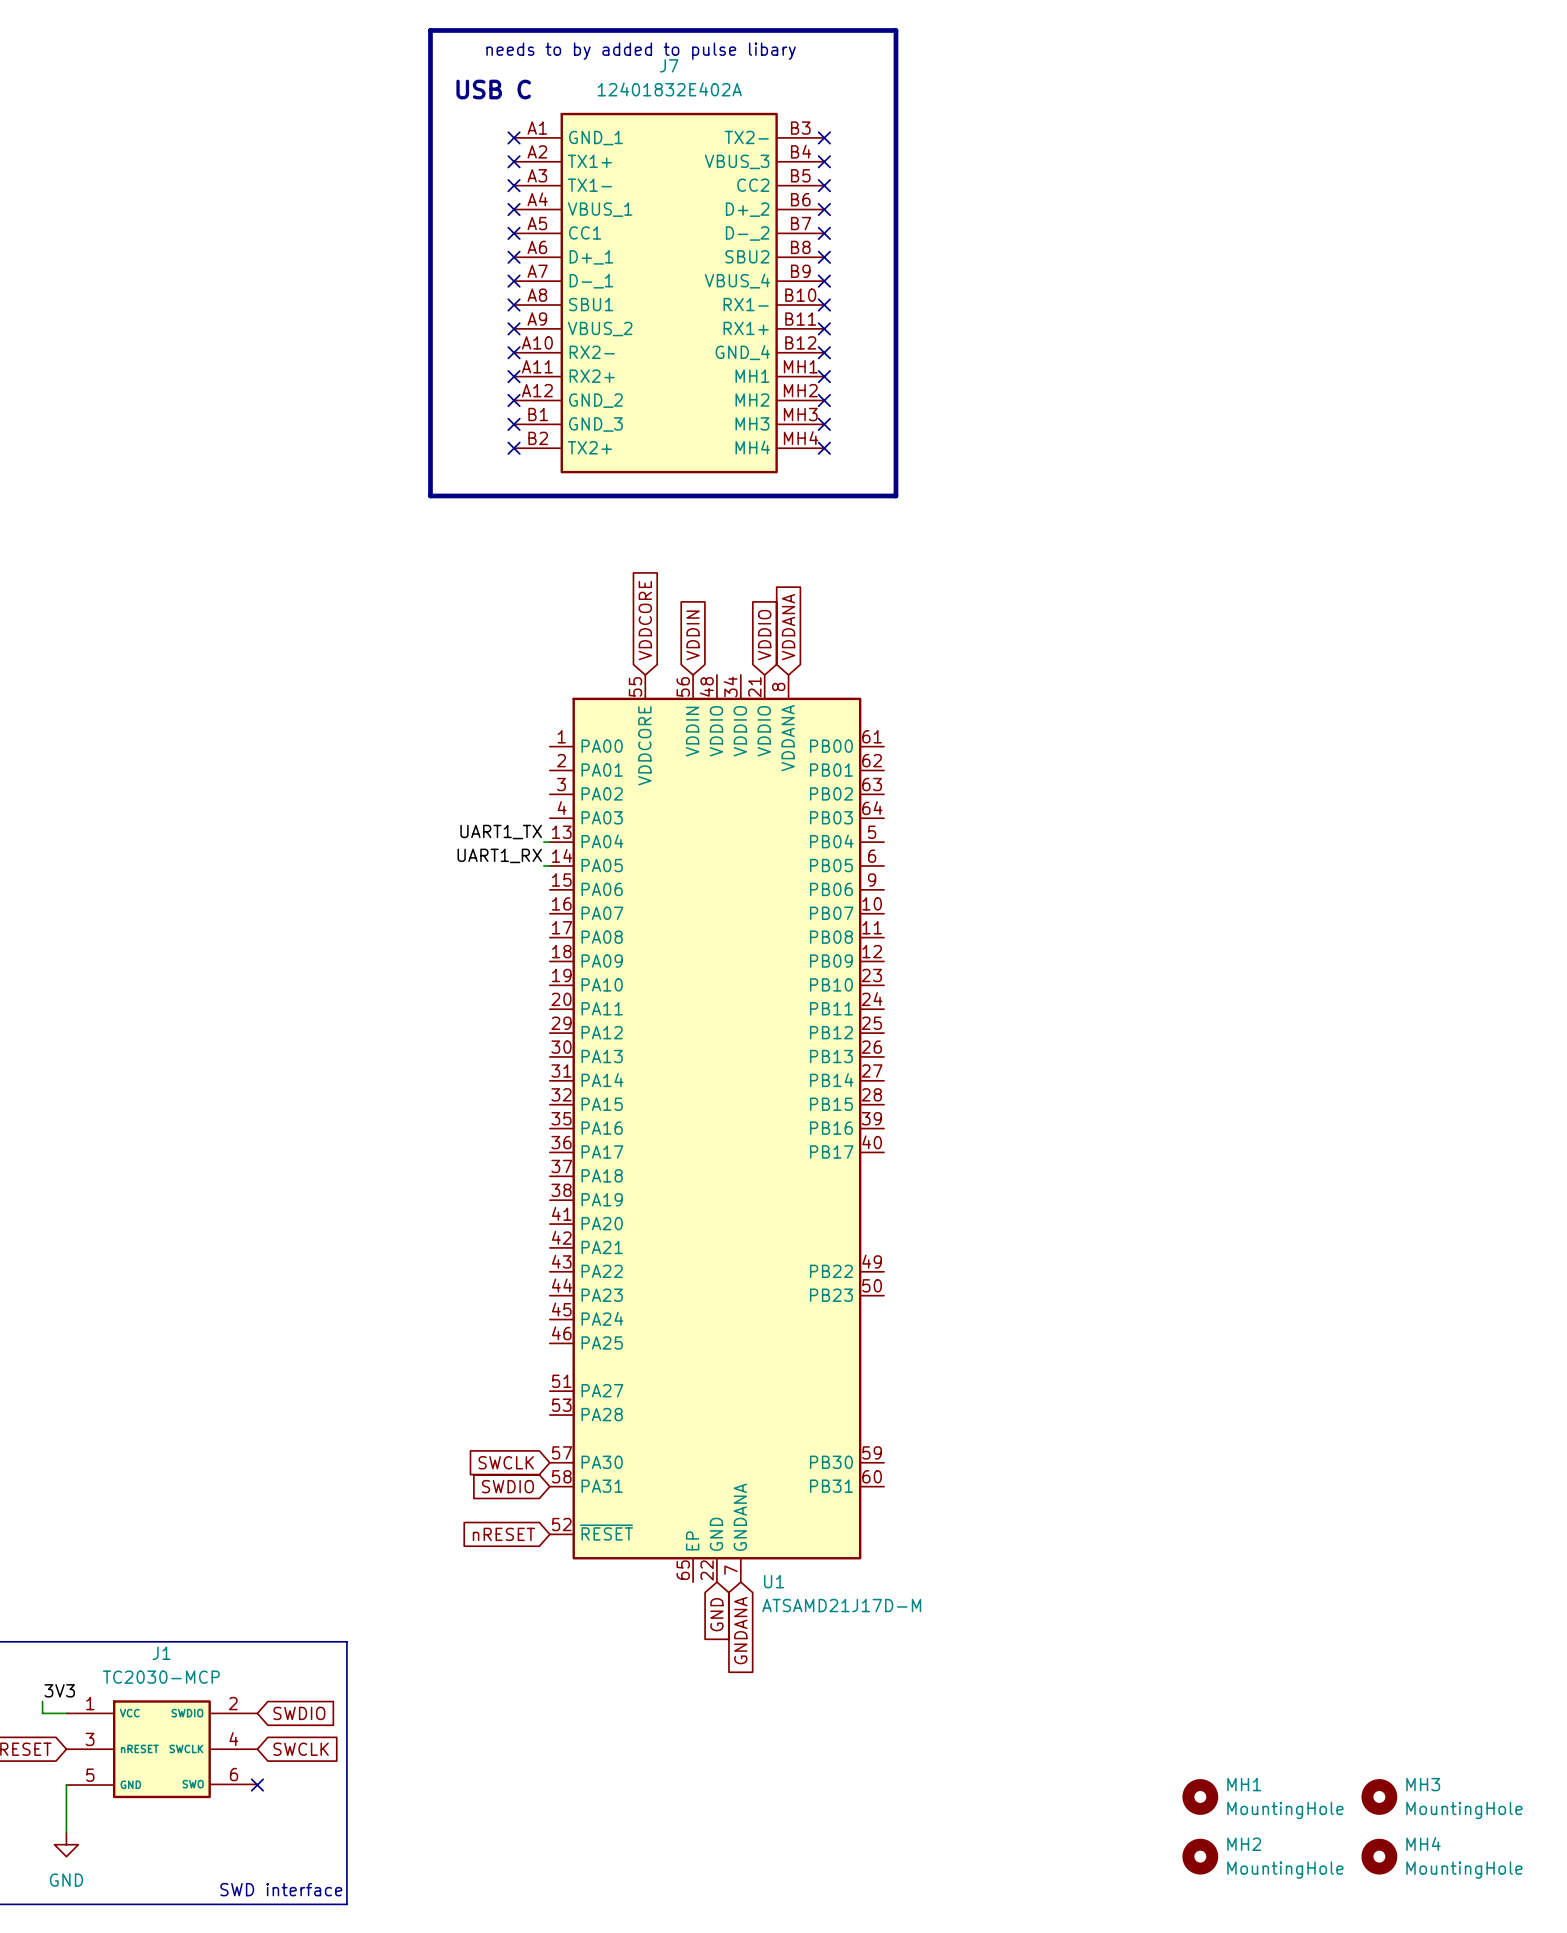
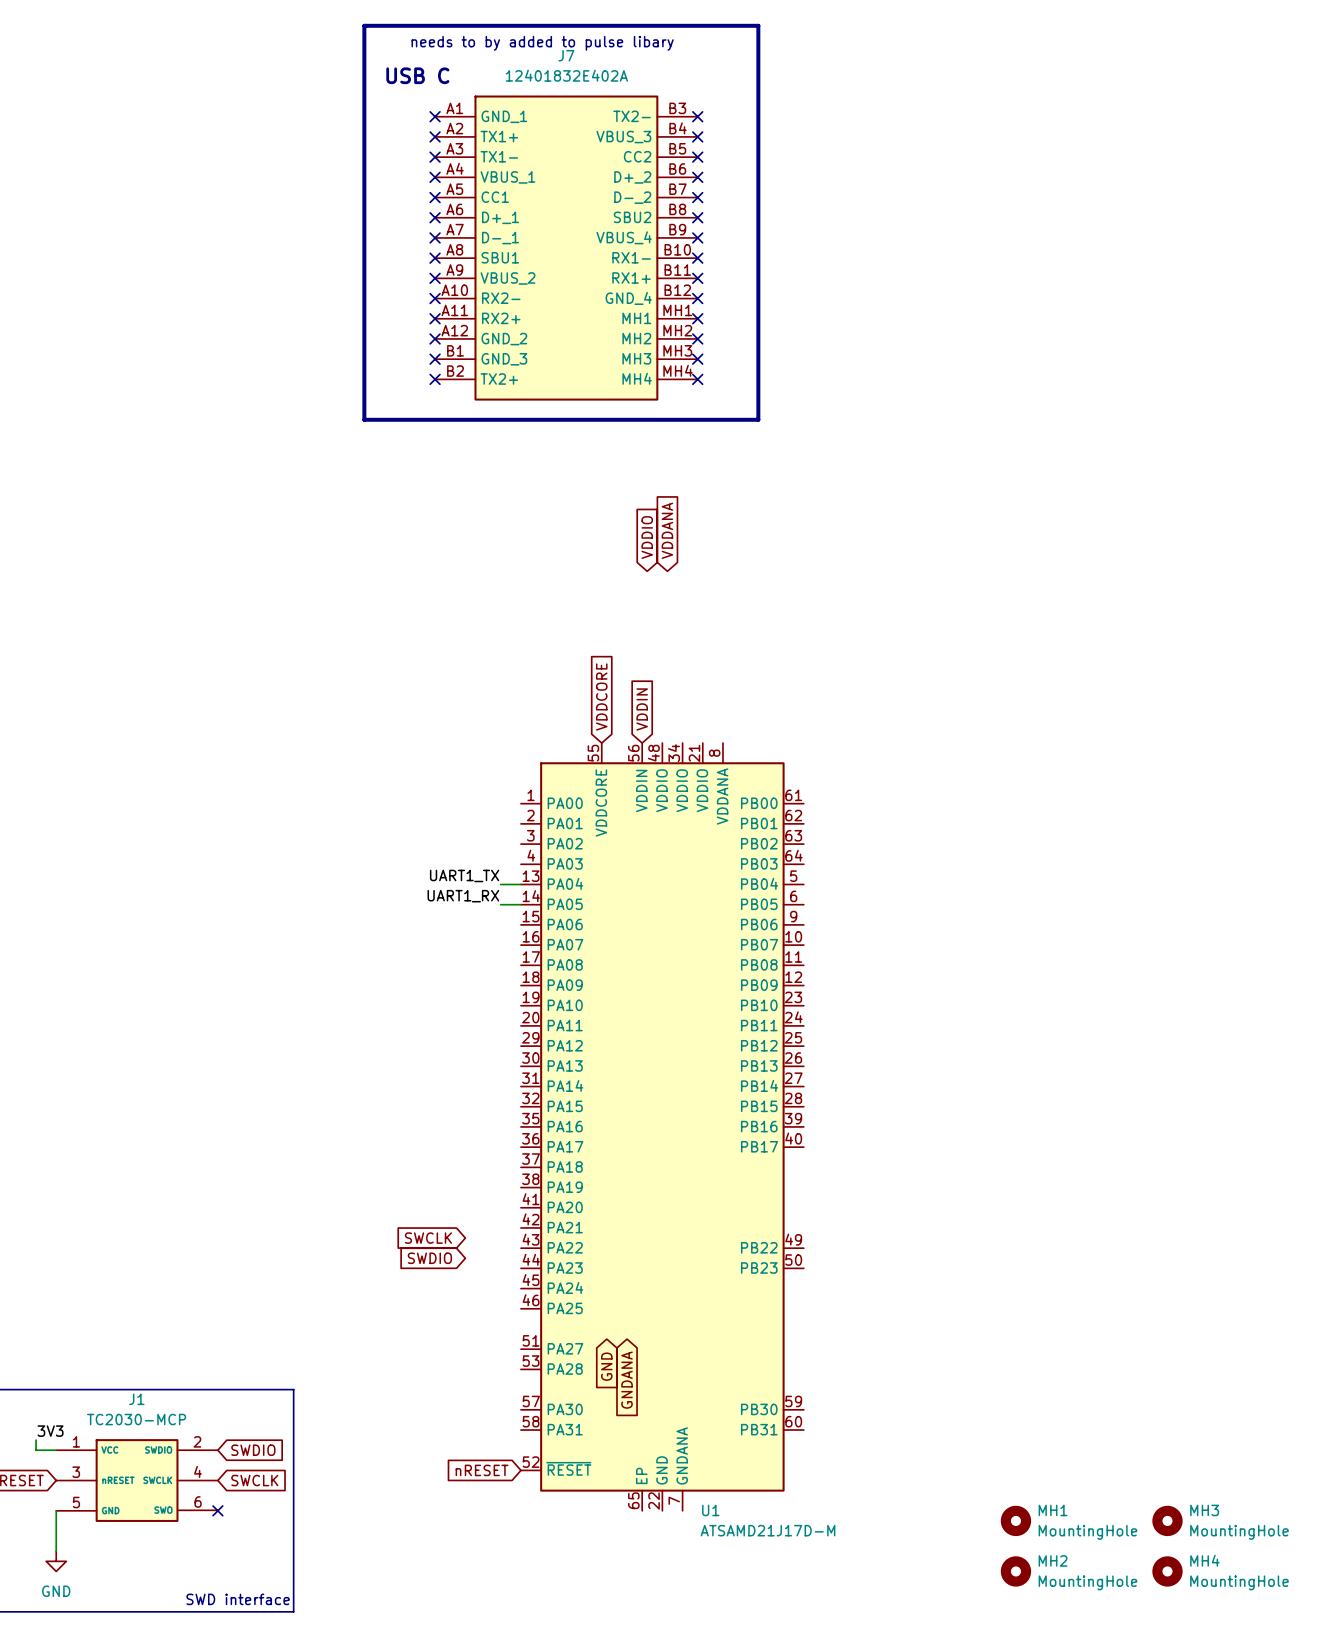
global label position: VDDCORE (645, 620) -> VDDCORE (601, 696)
global label position: VDDIN (693, 635) -> VDDIN (642, 709)
label position: UART1_TX (501, 832) -> UART1_TX (464, 875)
wire: (543, 842) (549, 842) -> none
label position: UART1_RX (499, 855) -> UART1_RX (463, 896)
wire: (543, 865) (549, 865) -> none
U1 position: (716, 1128) -> (662, 1126)
global label position: nRESET (503, 1534) -> nRESET (482, 1470)

